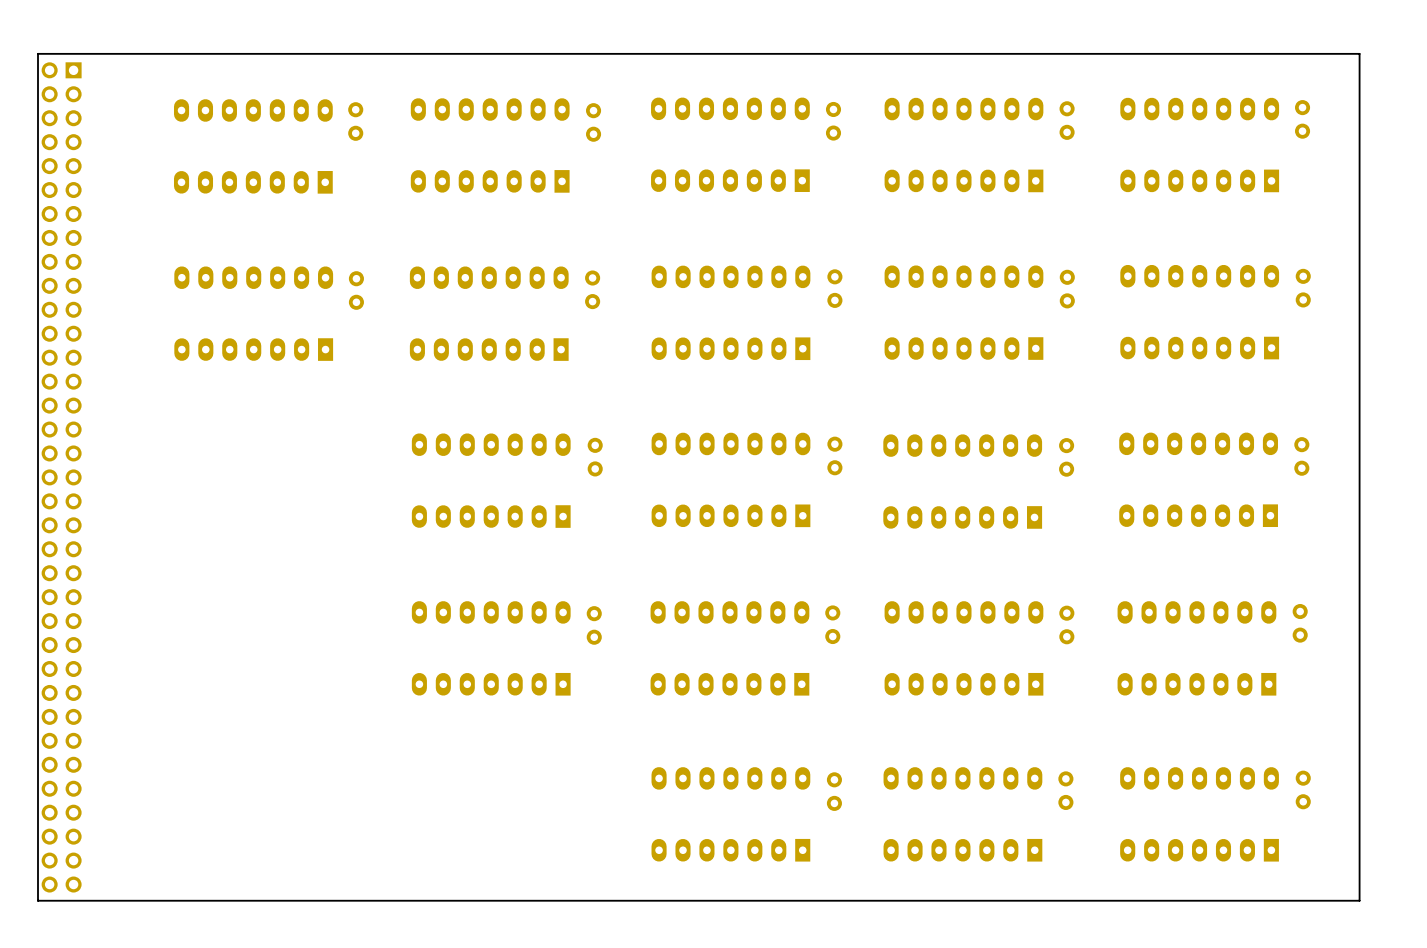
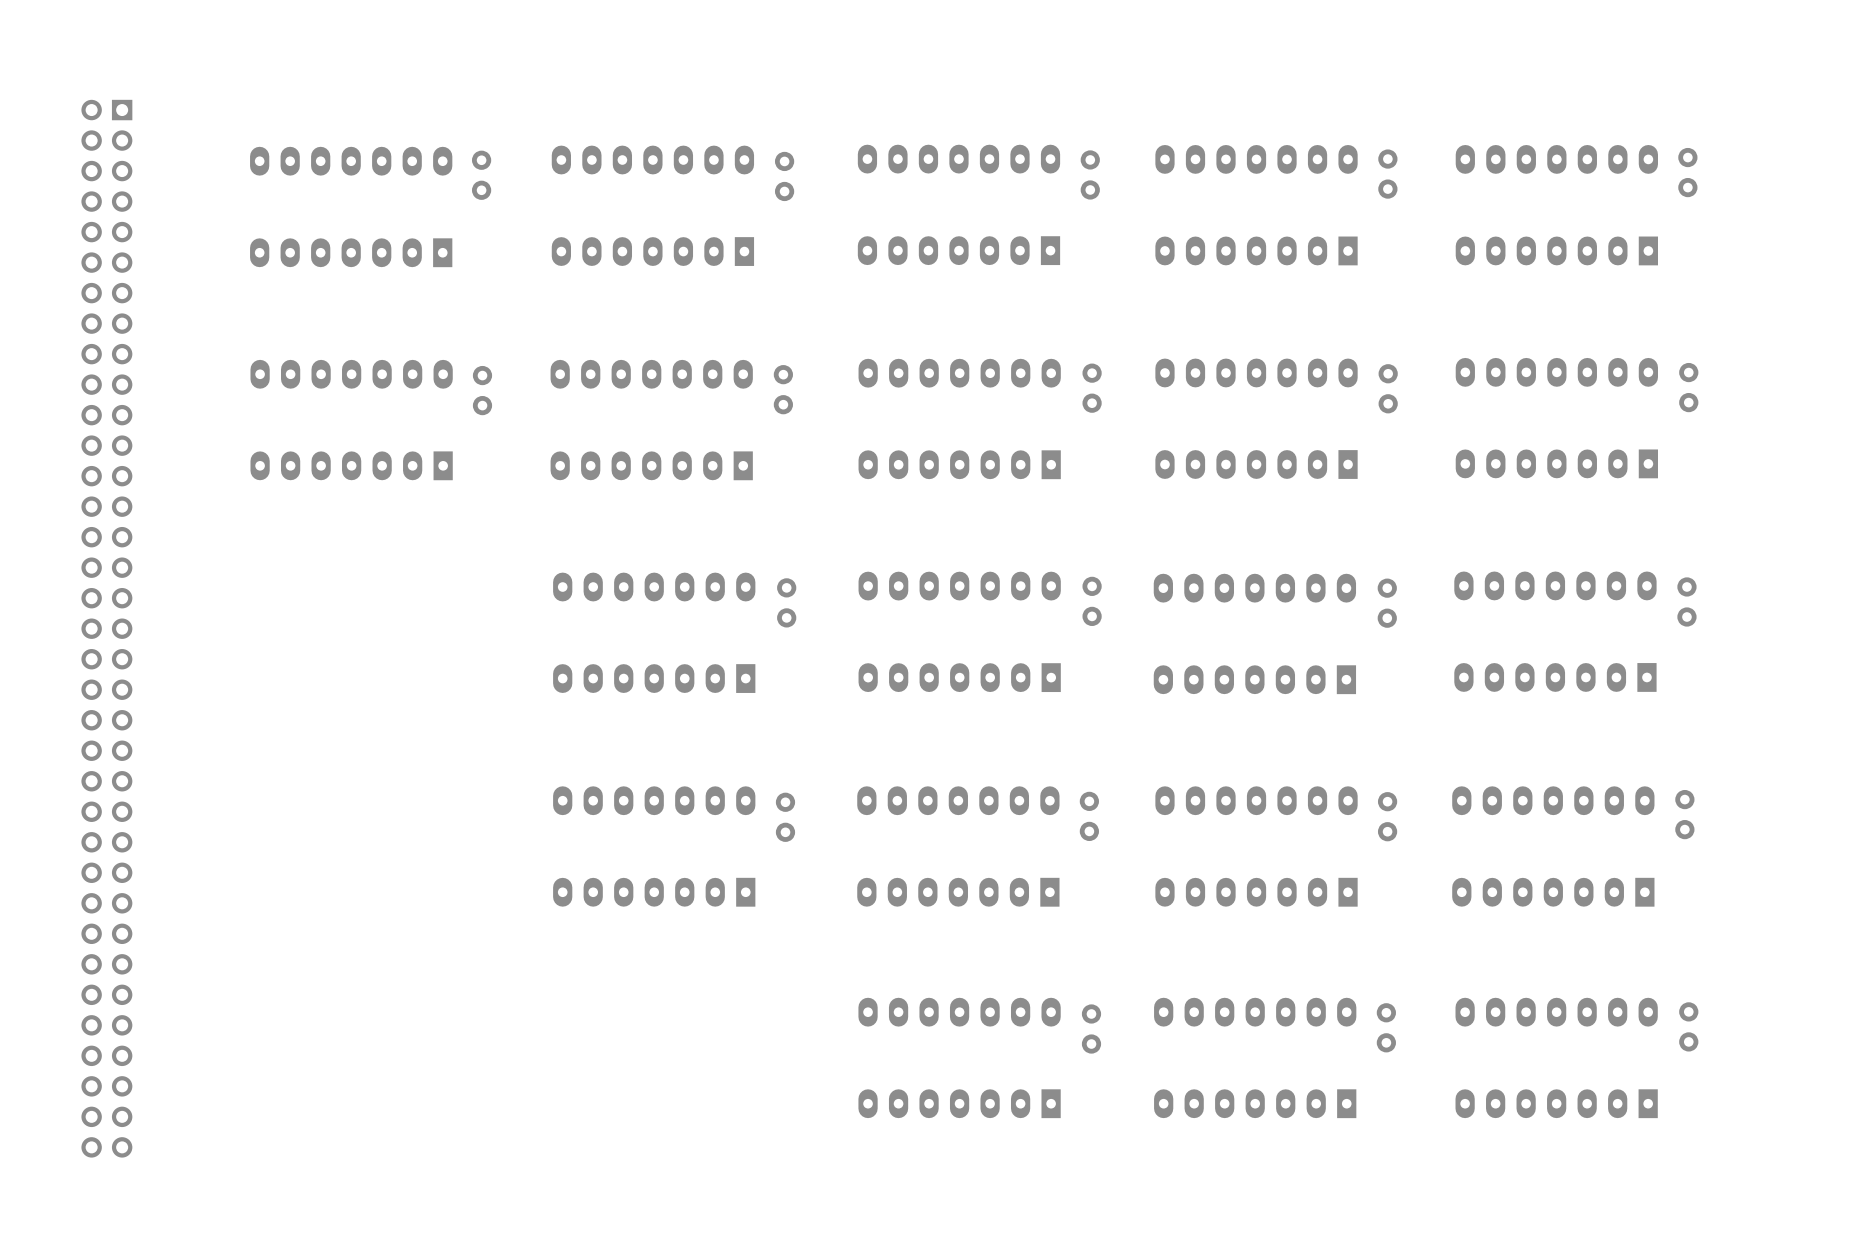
board edge: (1359, 53) (1359, 900) (38, 900) (38, 53) (1359, 53) -> none

